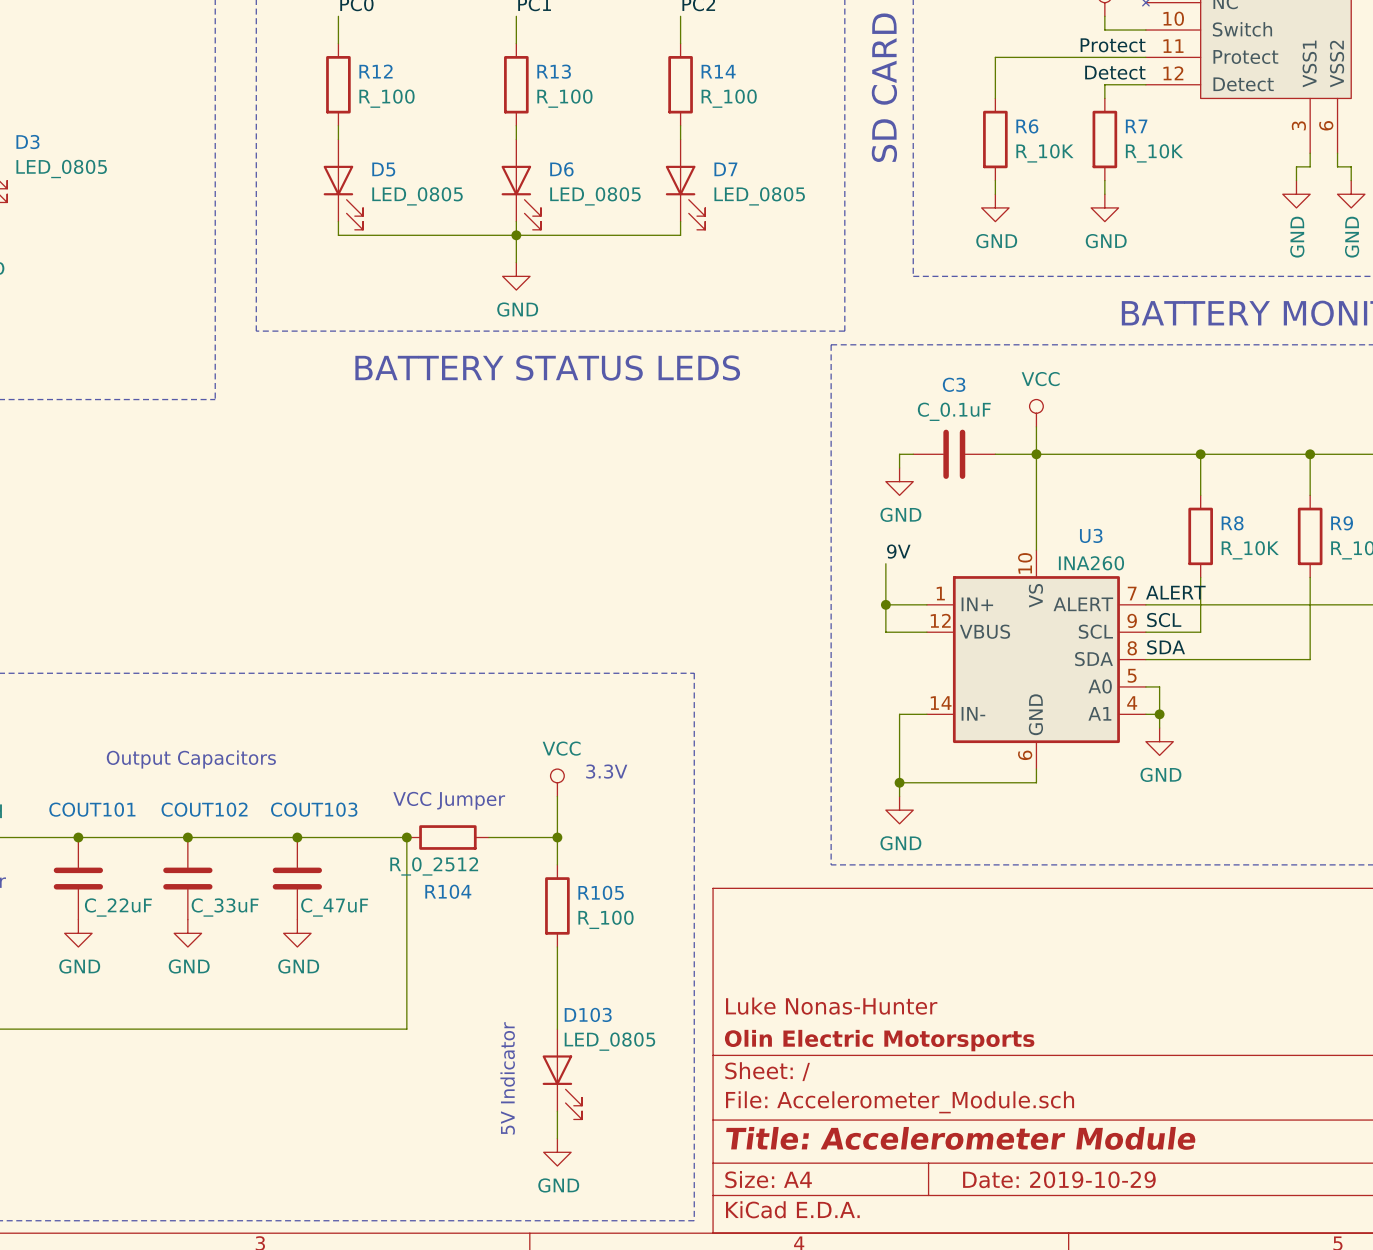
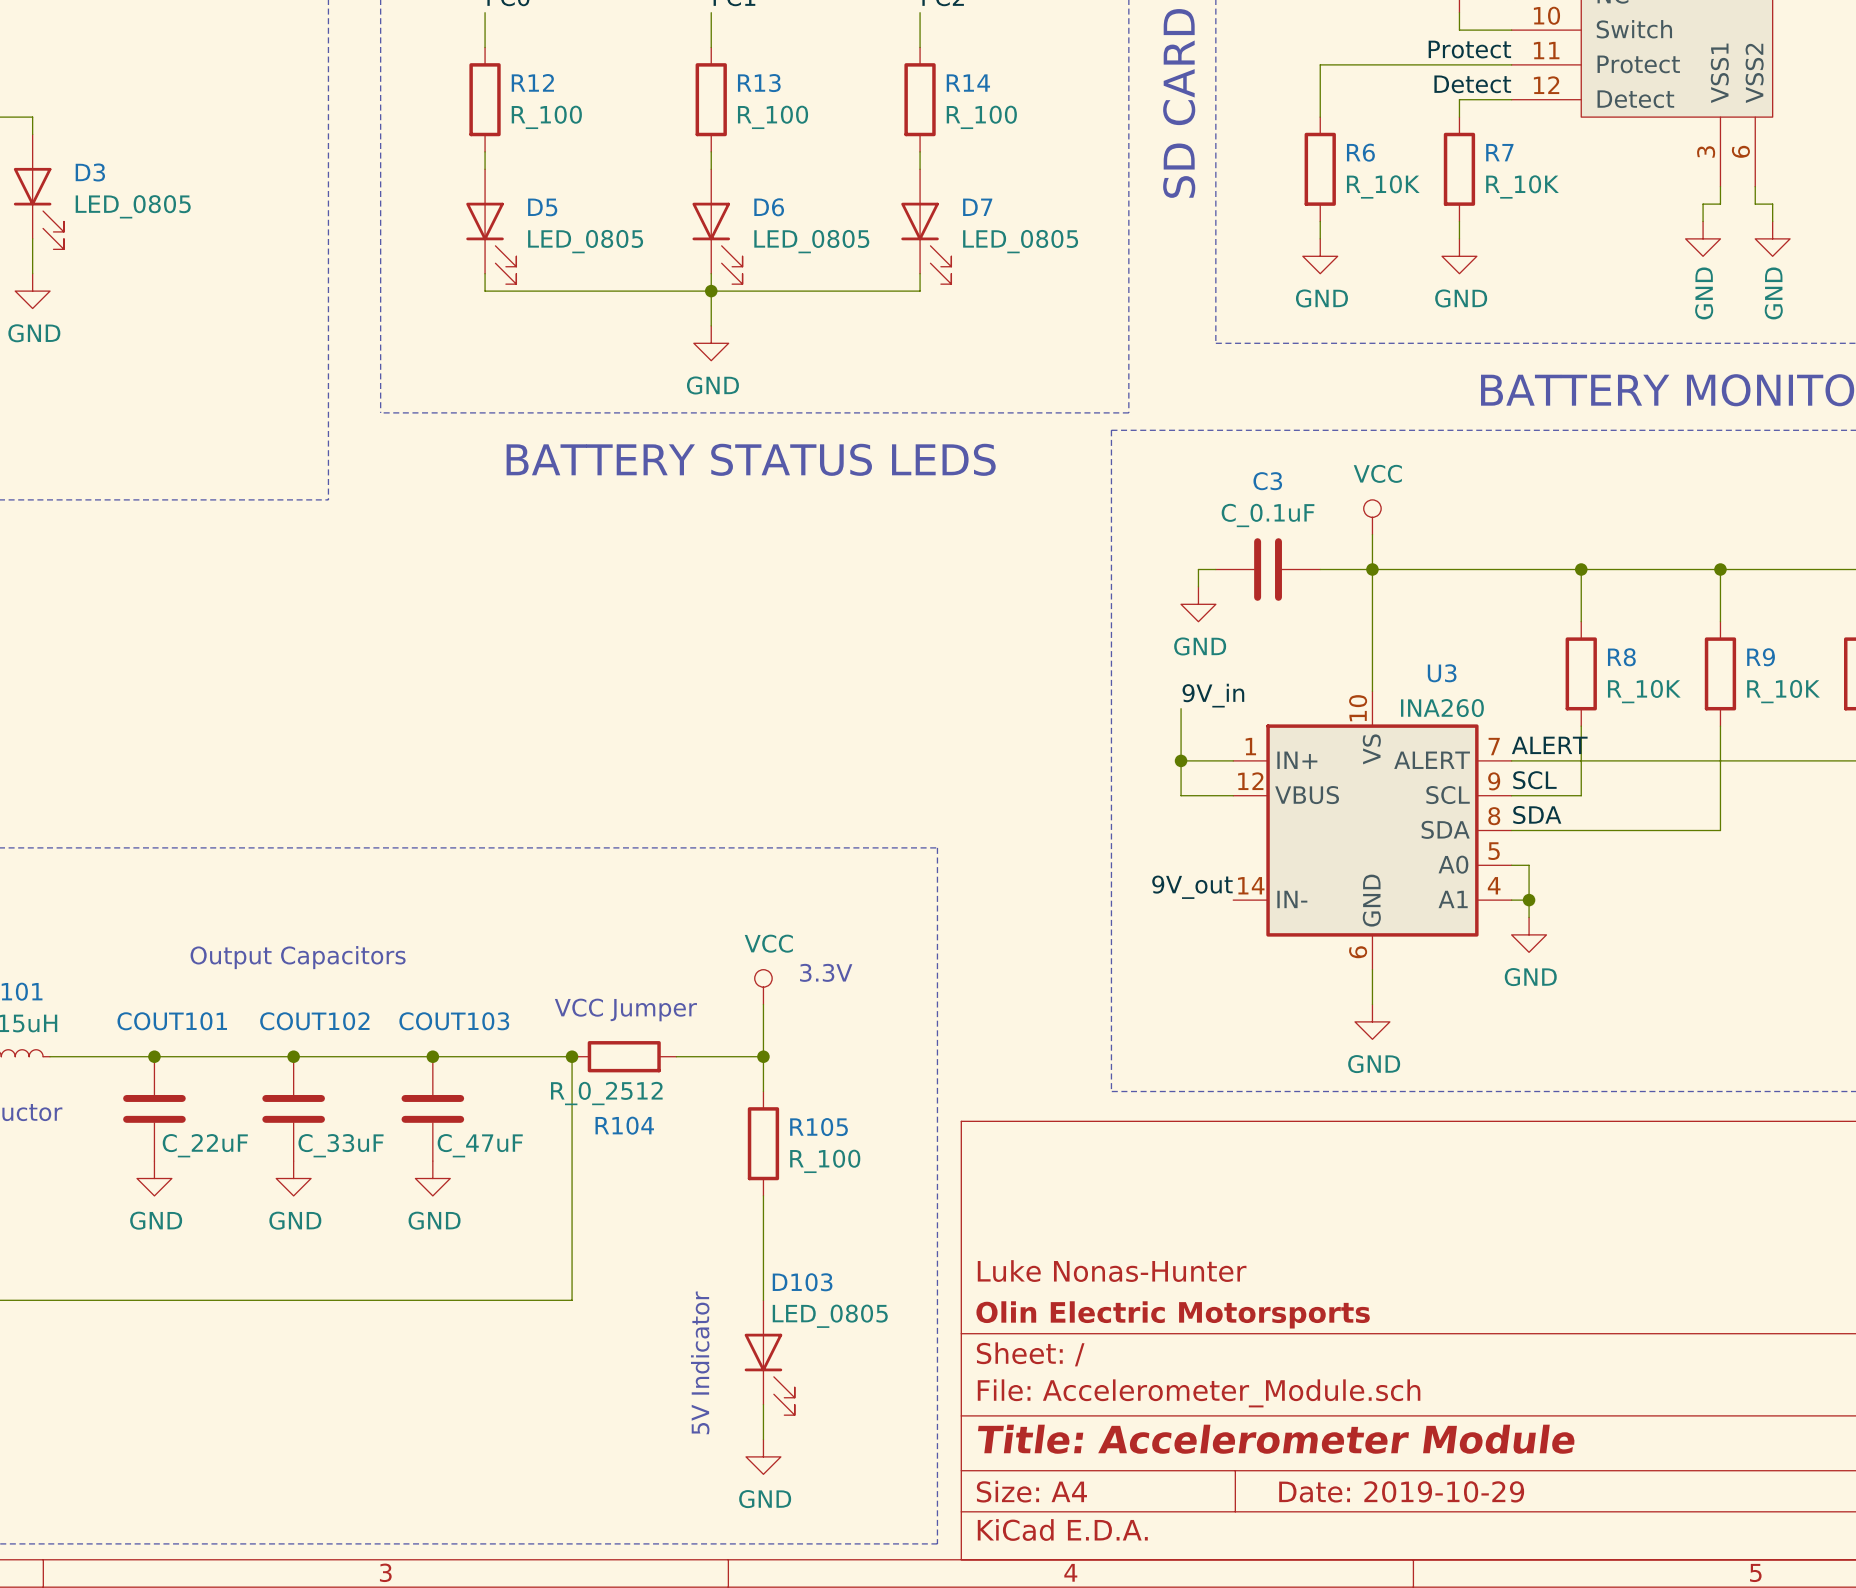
label: 9V (898, 551) -> 9V_in (1213, 695)
label: none -> 9V_out (1192, 887)
wire: (926, 714) (899, 714) (899, 796) -> none
wire: (899, 782) (1036, 782) -> (1372, 1004) (1372, 987)
junction: (899, 782) -> none
power symbol position: GND (899, 810) -> GND (1372, 1021)

